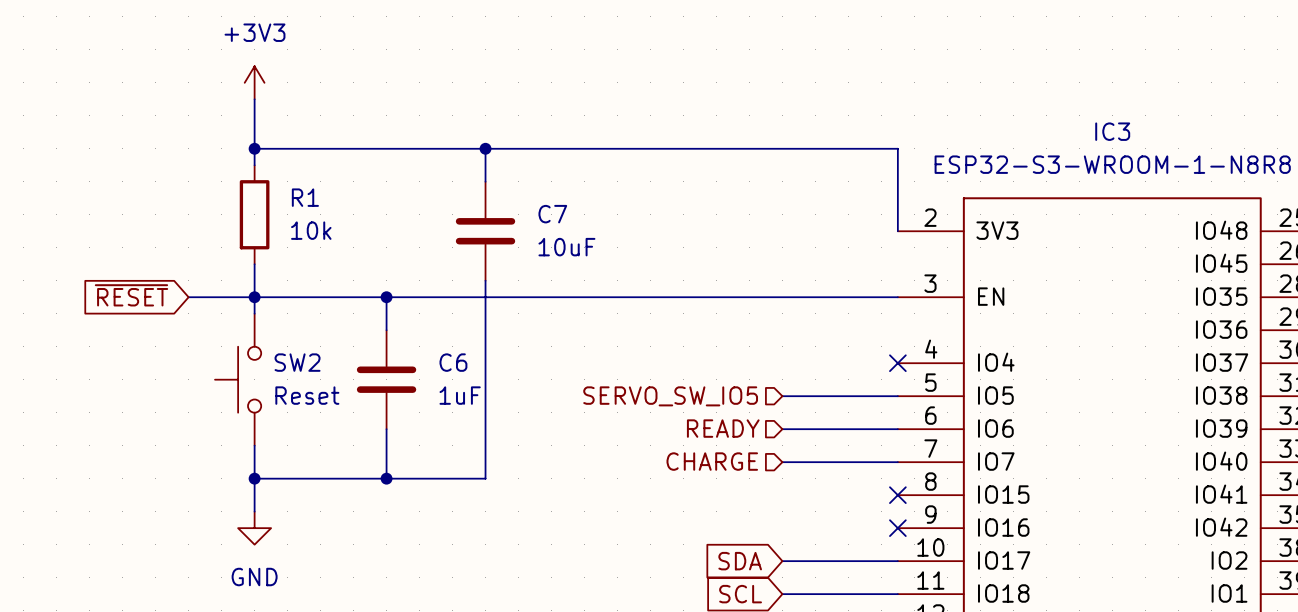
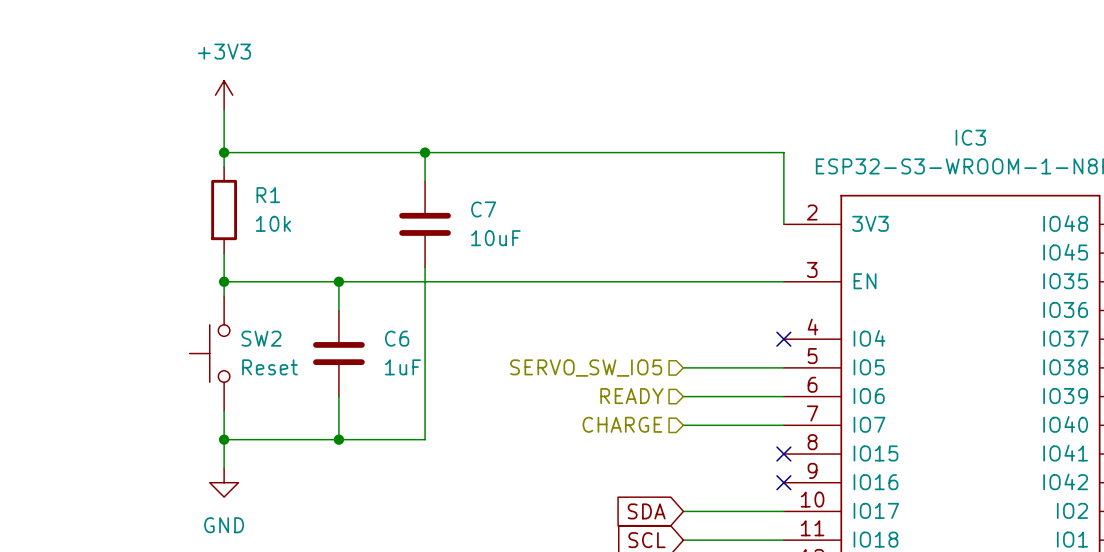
global label: ~{RESET} (131, 295) -> none
wire: (188, 297) (254, 297) -> none

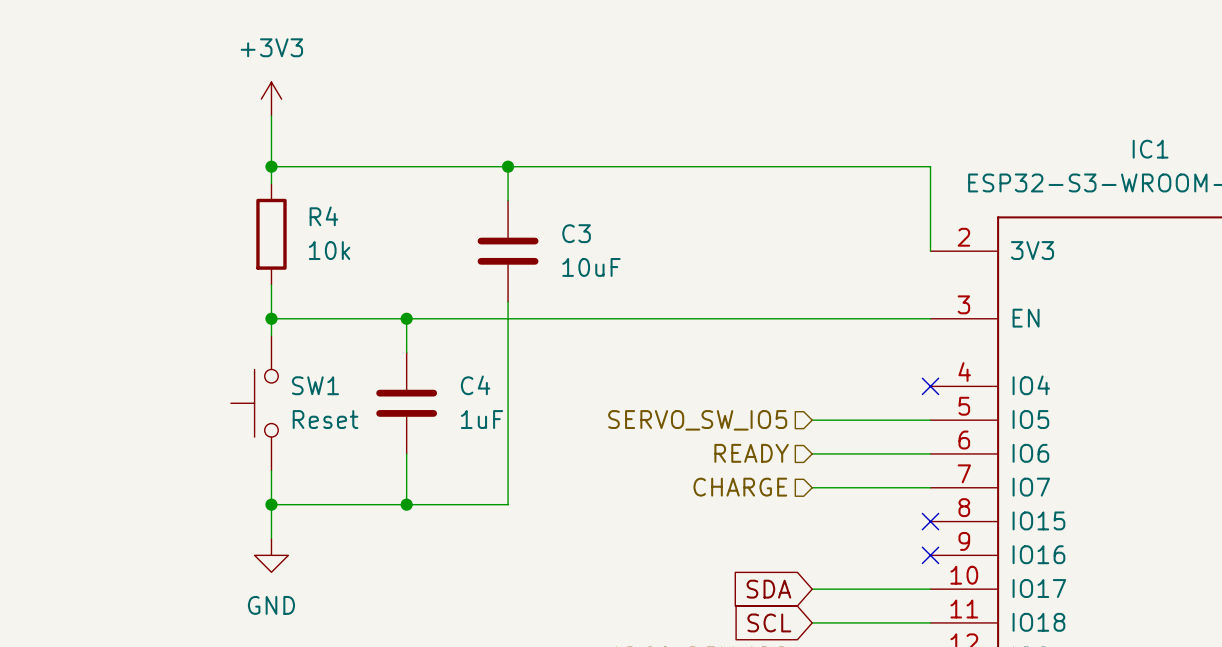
IC3 name: IC3 (970, 137) -> IC1 (1150, 149)
R1 name: R1 (268, 195) -> R4 (323, 216)
C7 name: C7 (483, 209) -> C3 (576, 233)
SW2 name: SW2 (261, 338) -> SW1 (315, 385)
C6 name: C6 (397, 338) -> C4 (475, 385)

